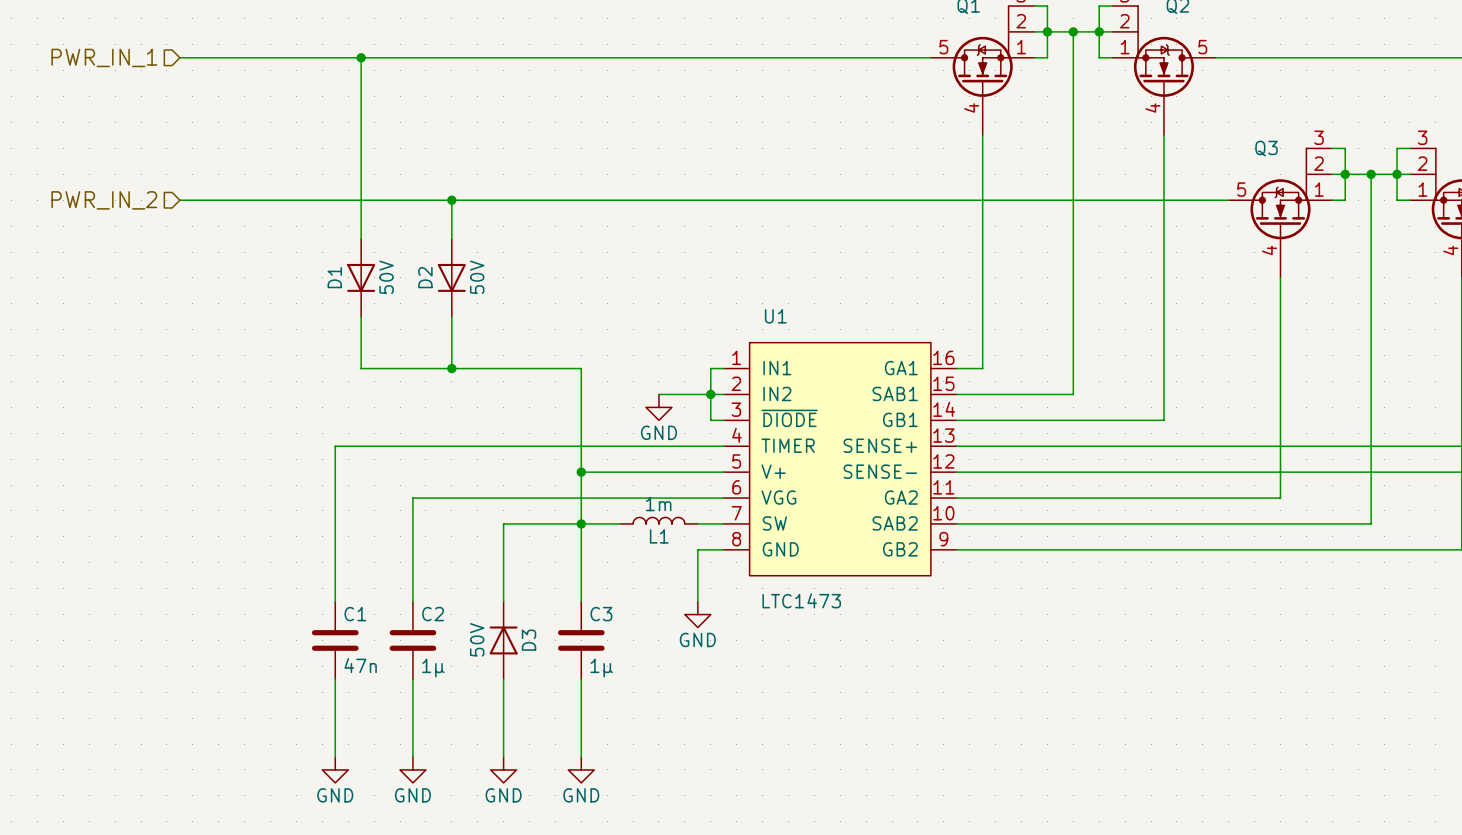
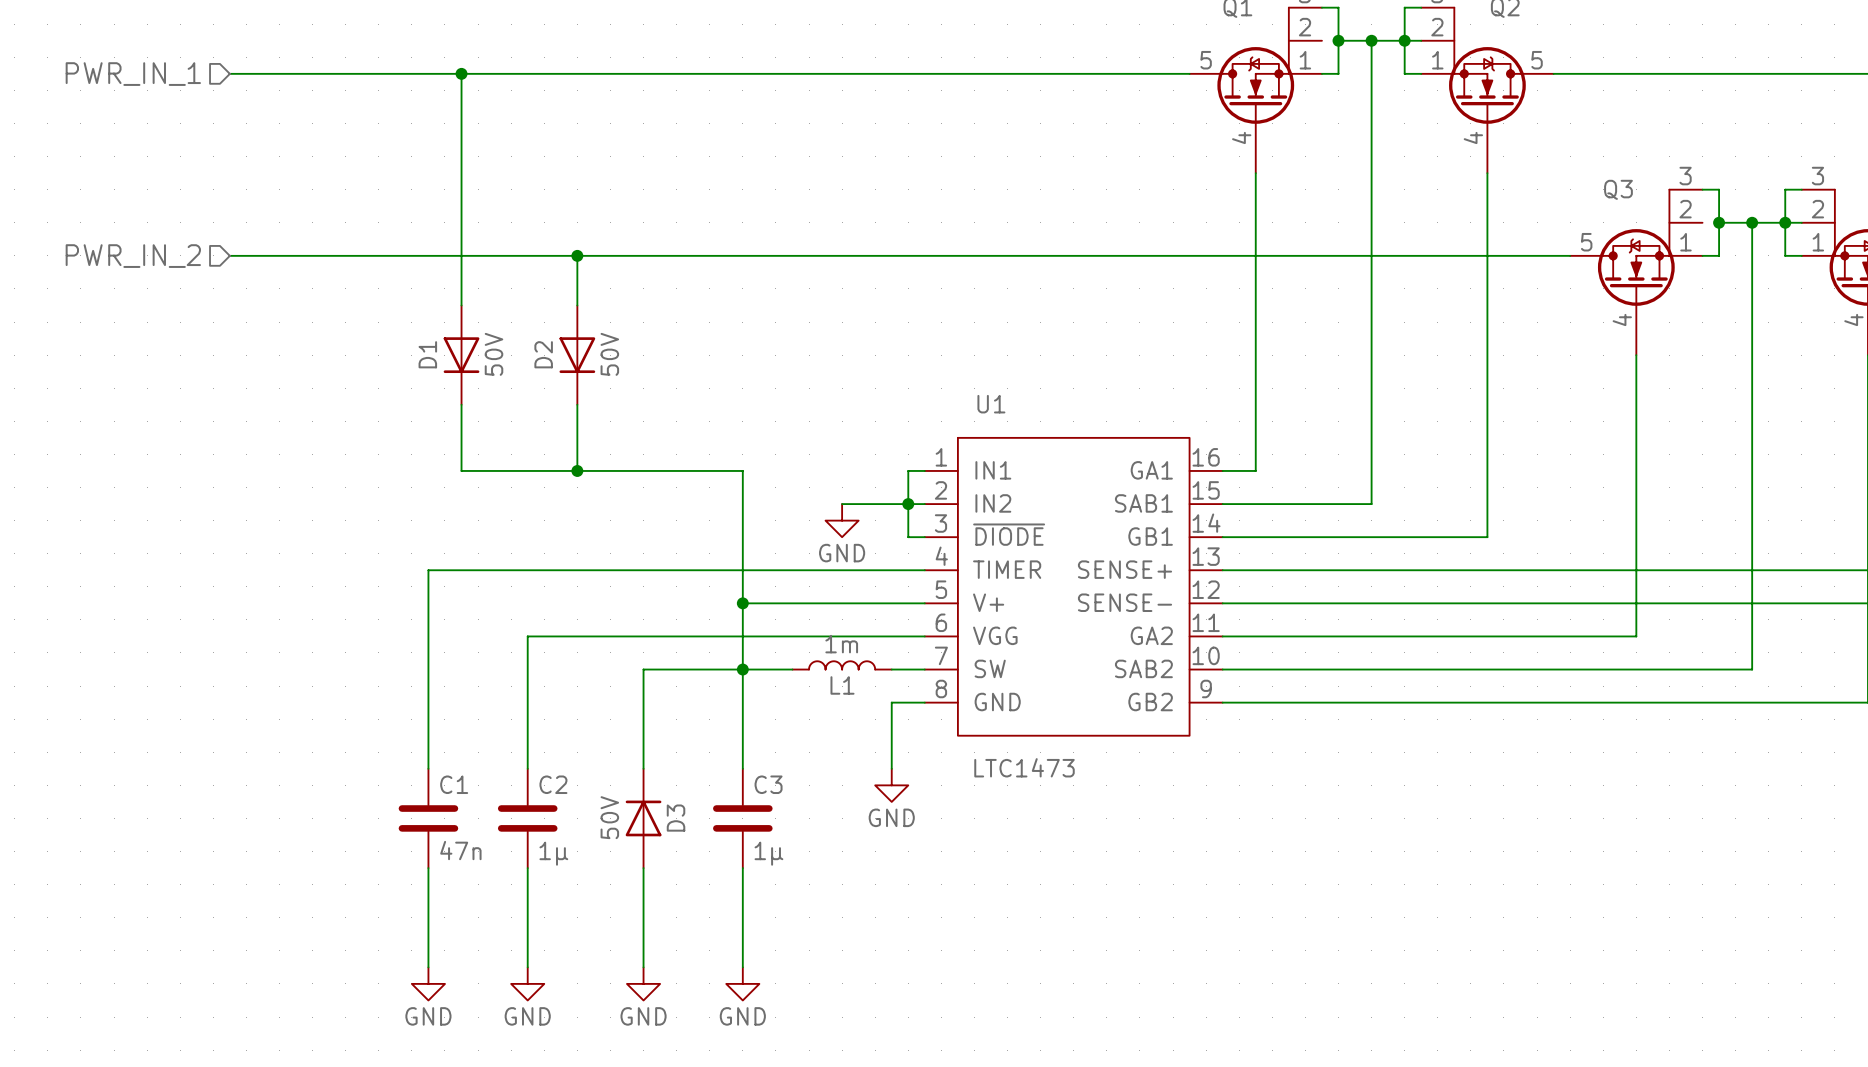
wire: (1034, 31) (1047, 31) -> none
wire: (1332, 174) (1345, 174) -> none

